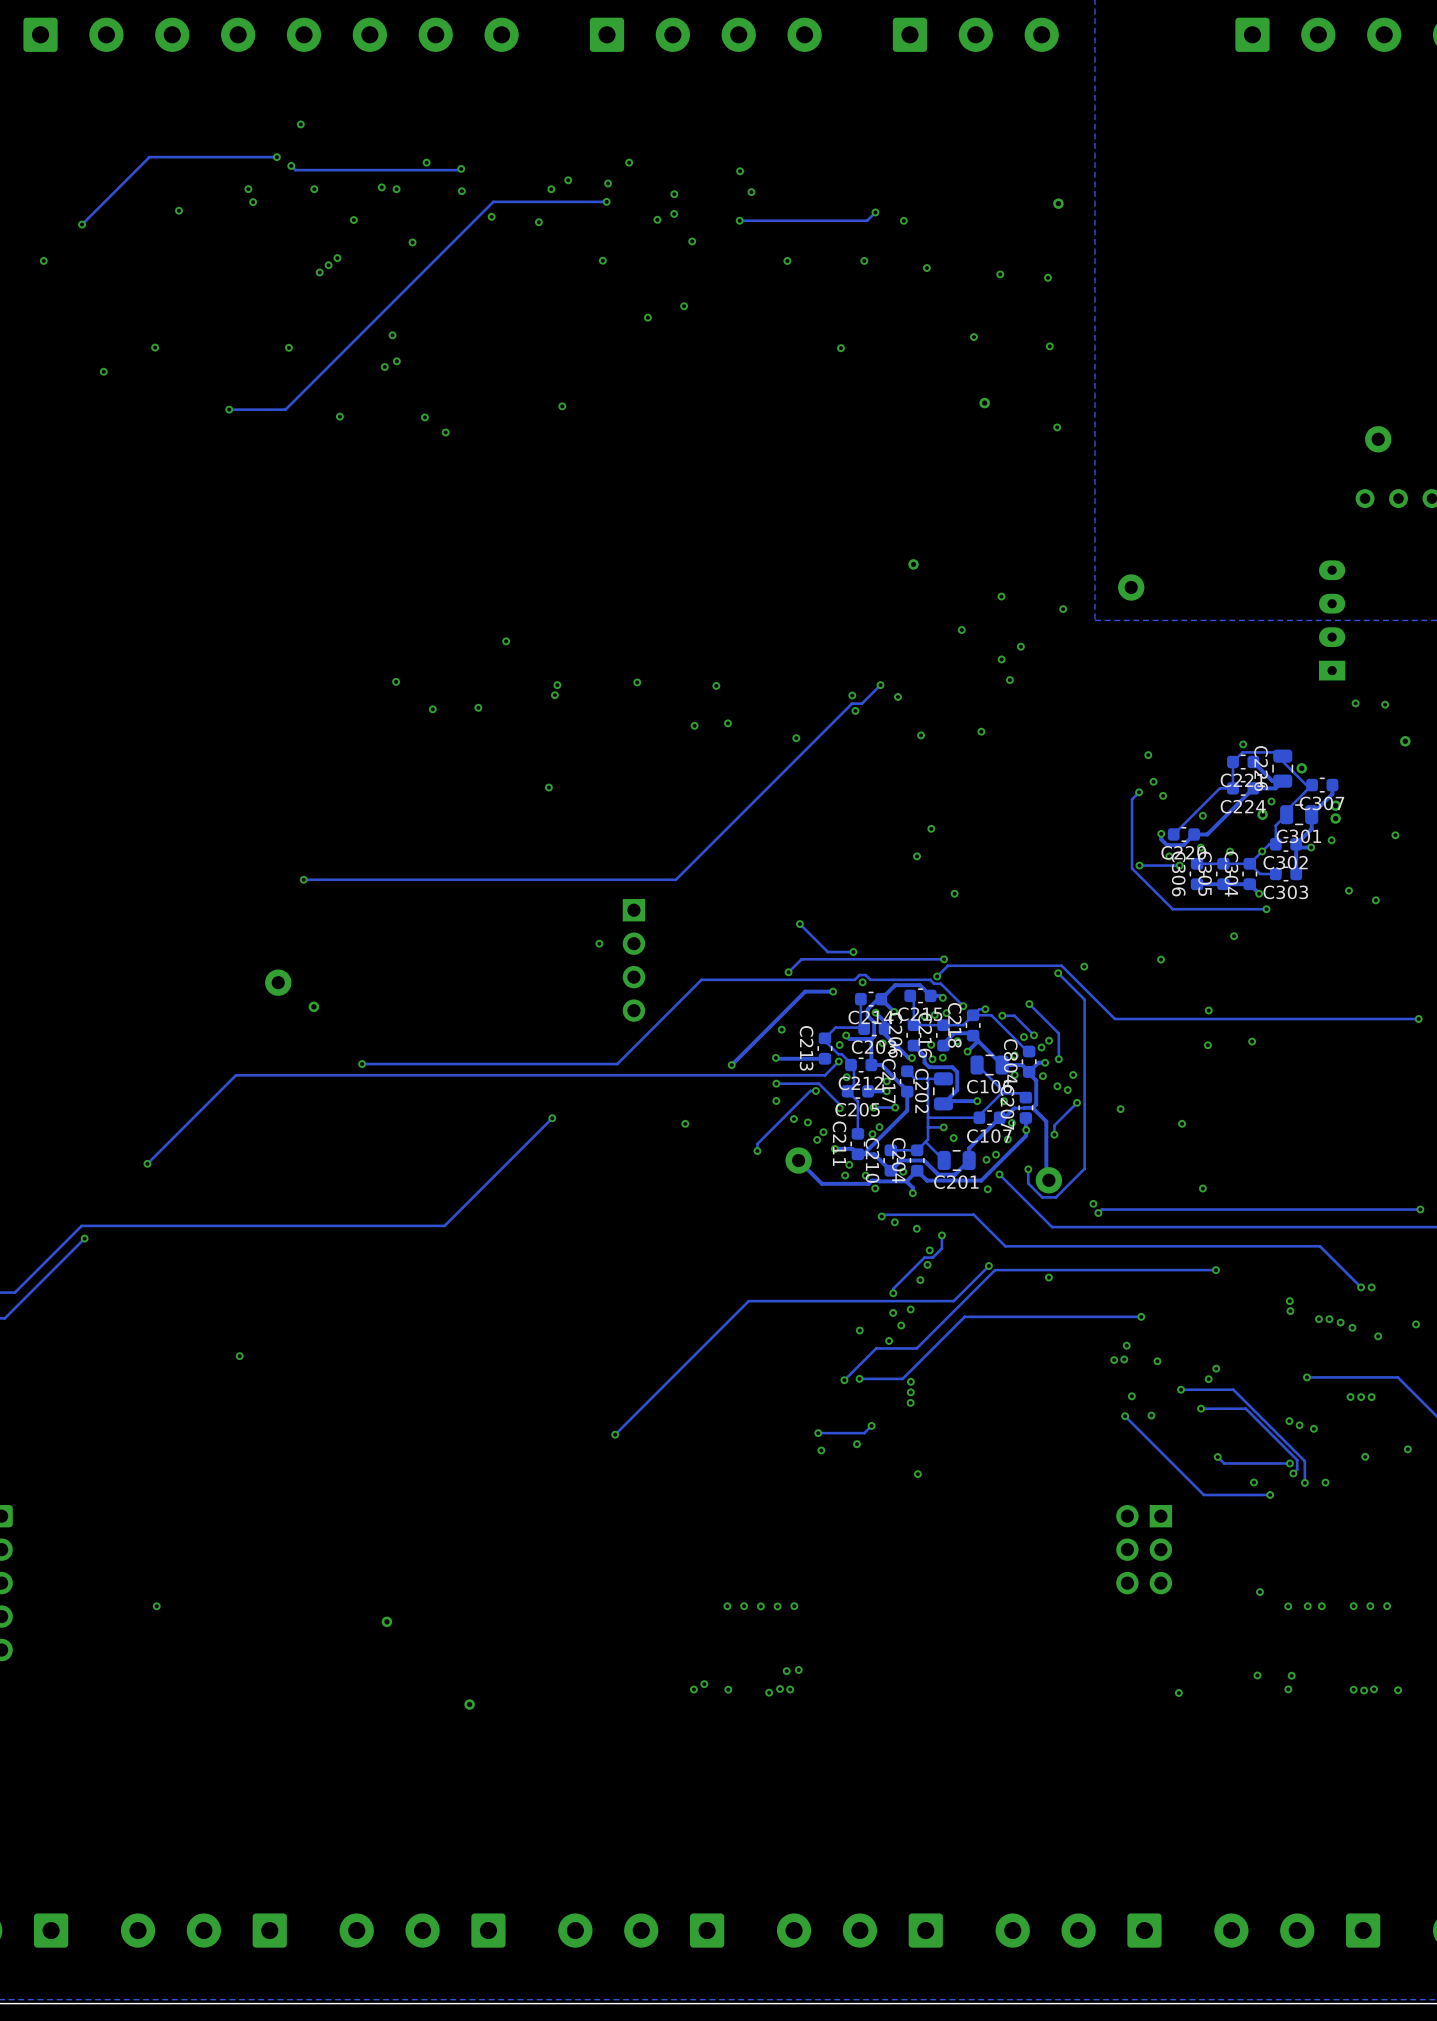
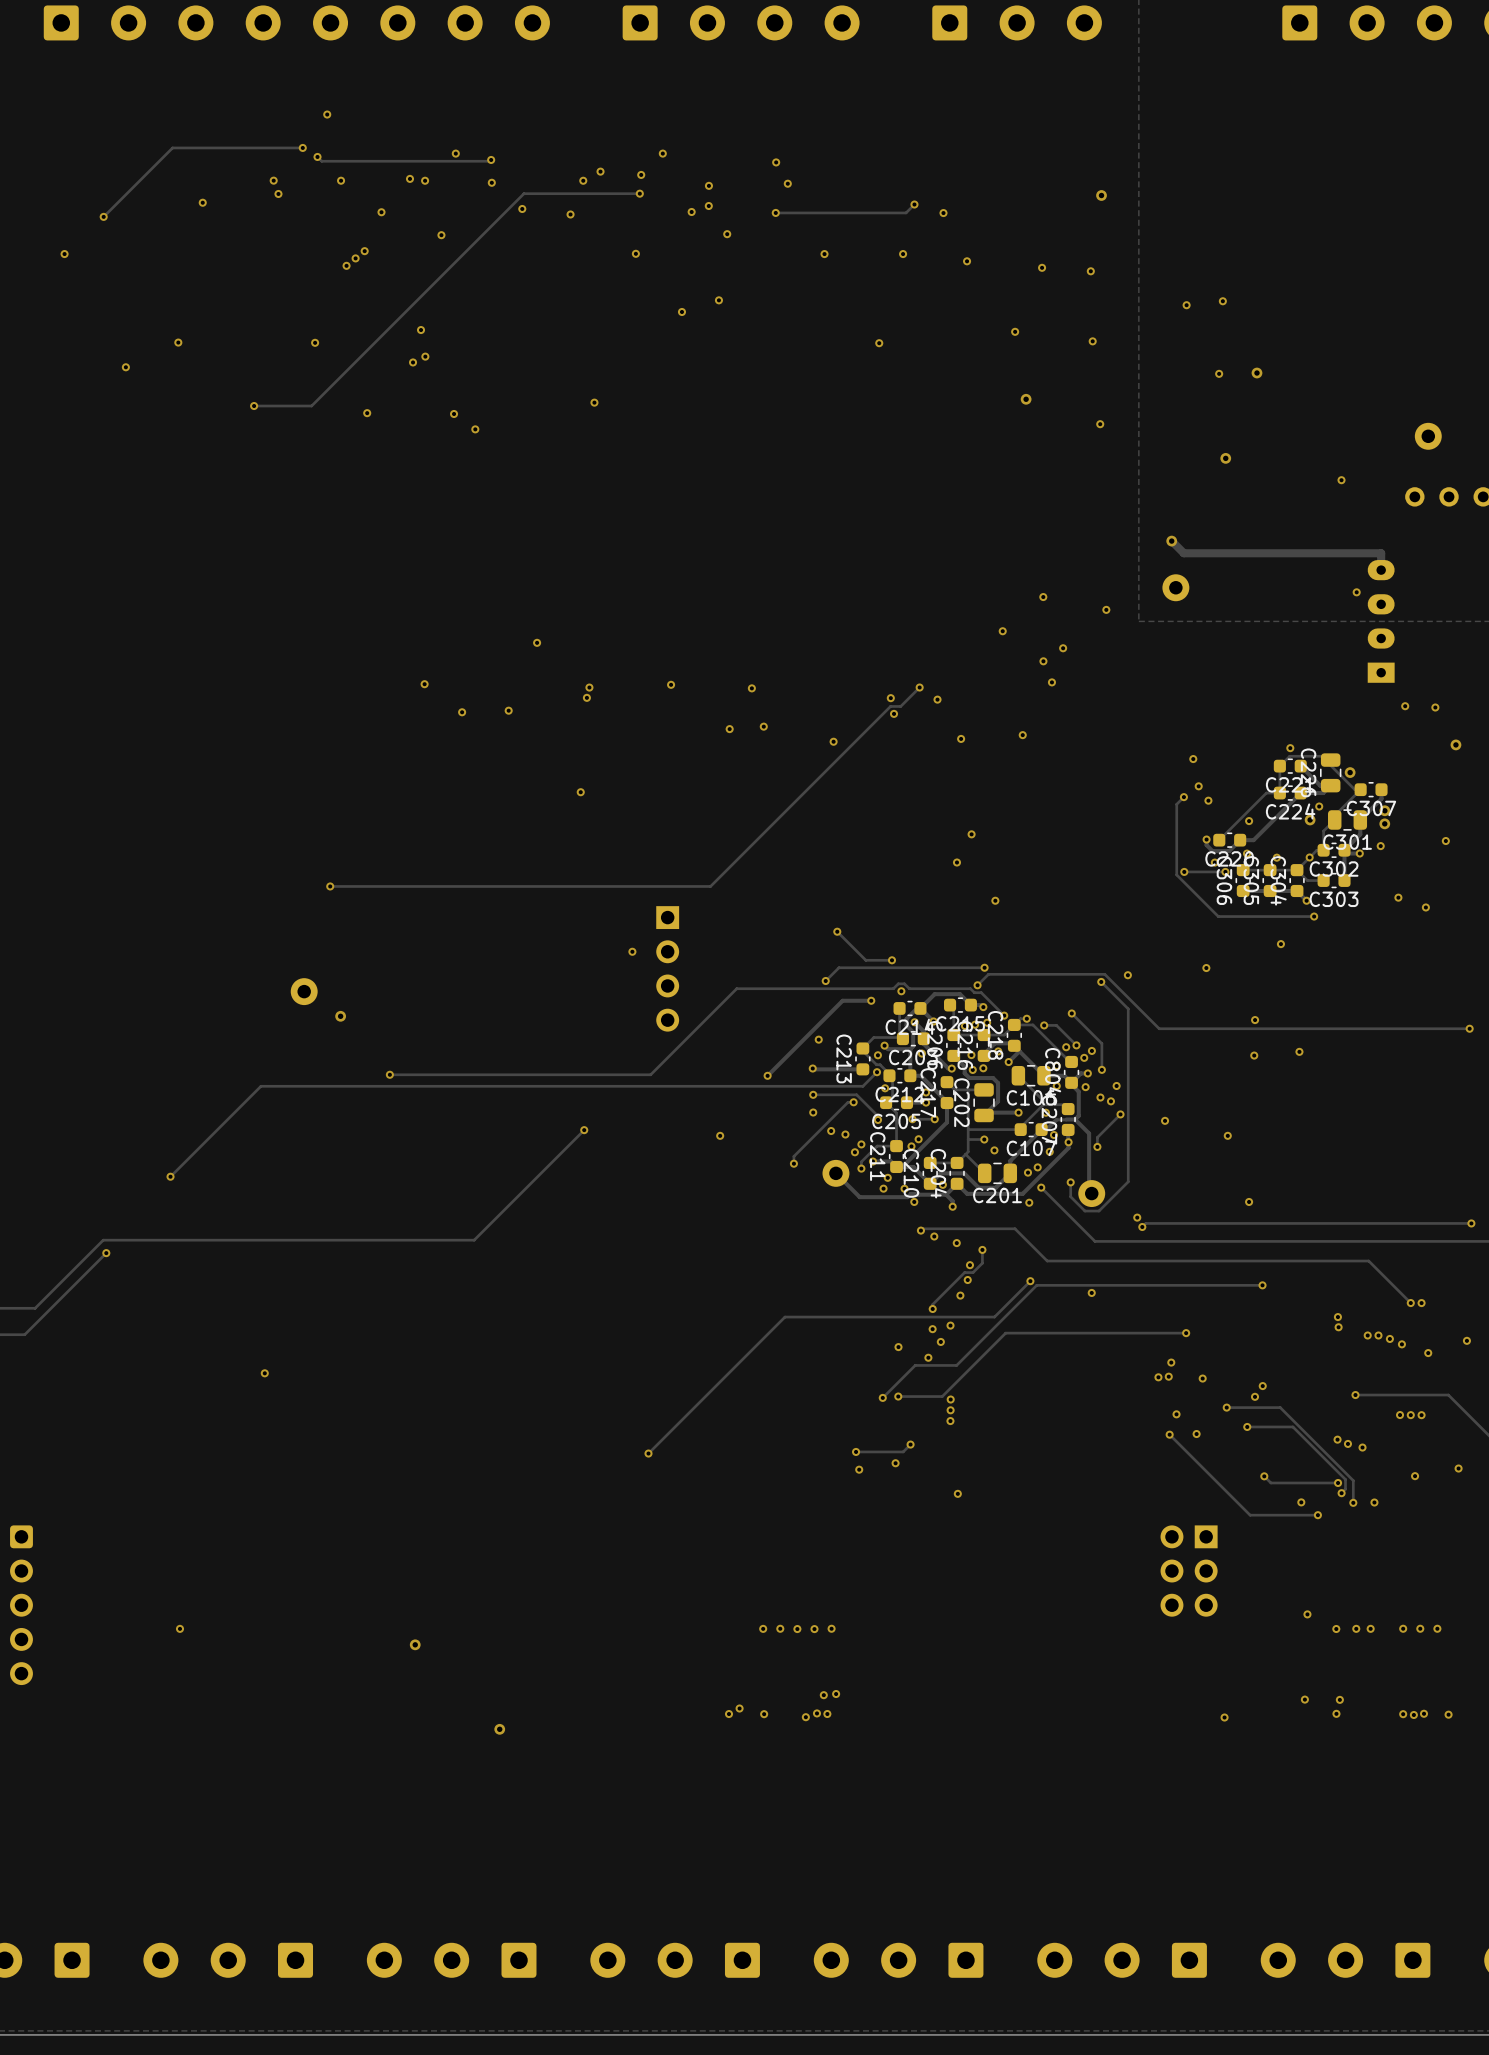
via: none -> (1222, 301)
via: none -> (1186, 305)
via: none -> (1256, 373)
via: none -> (1219, 373)
via: none -> (1225, 458)
via: none -> (1341, 480)
track: none -> (1171, 541) (1183, 553) (1381, 553) (1381, 570)
via: none -> (1171, 541)
via: (913, 564) -> none
via: none -> (1356, 592)
track: none -> (896, 1146) (877, 1146) (861, 1161) (861, 1168)
via: none -> (861, 1168)

